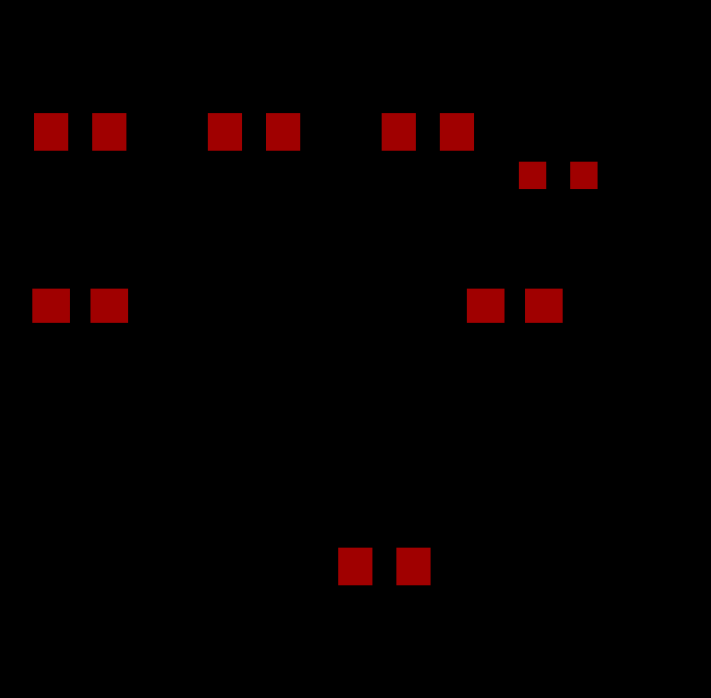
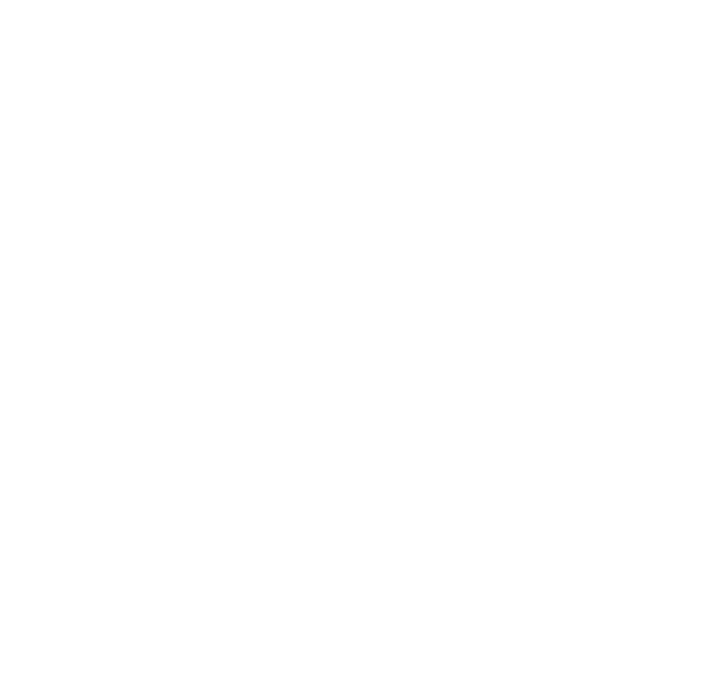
part: (80, 131) -> none
part: (254, 131) -> none
part: (427, 131) -> none
part: (558, 175) -> none
part: (80, 305) -> none
part: (514, 305) -> none
part: (384, 566) -> none

